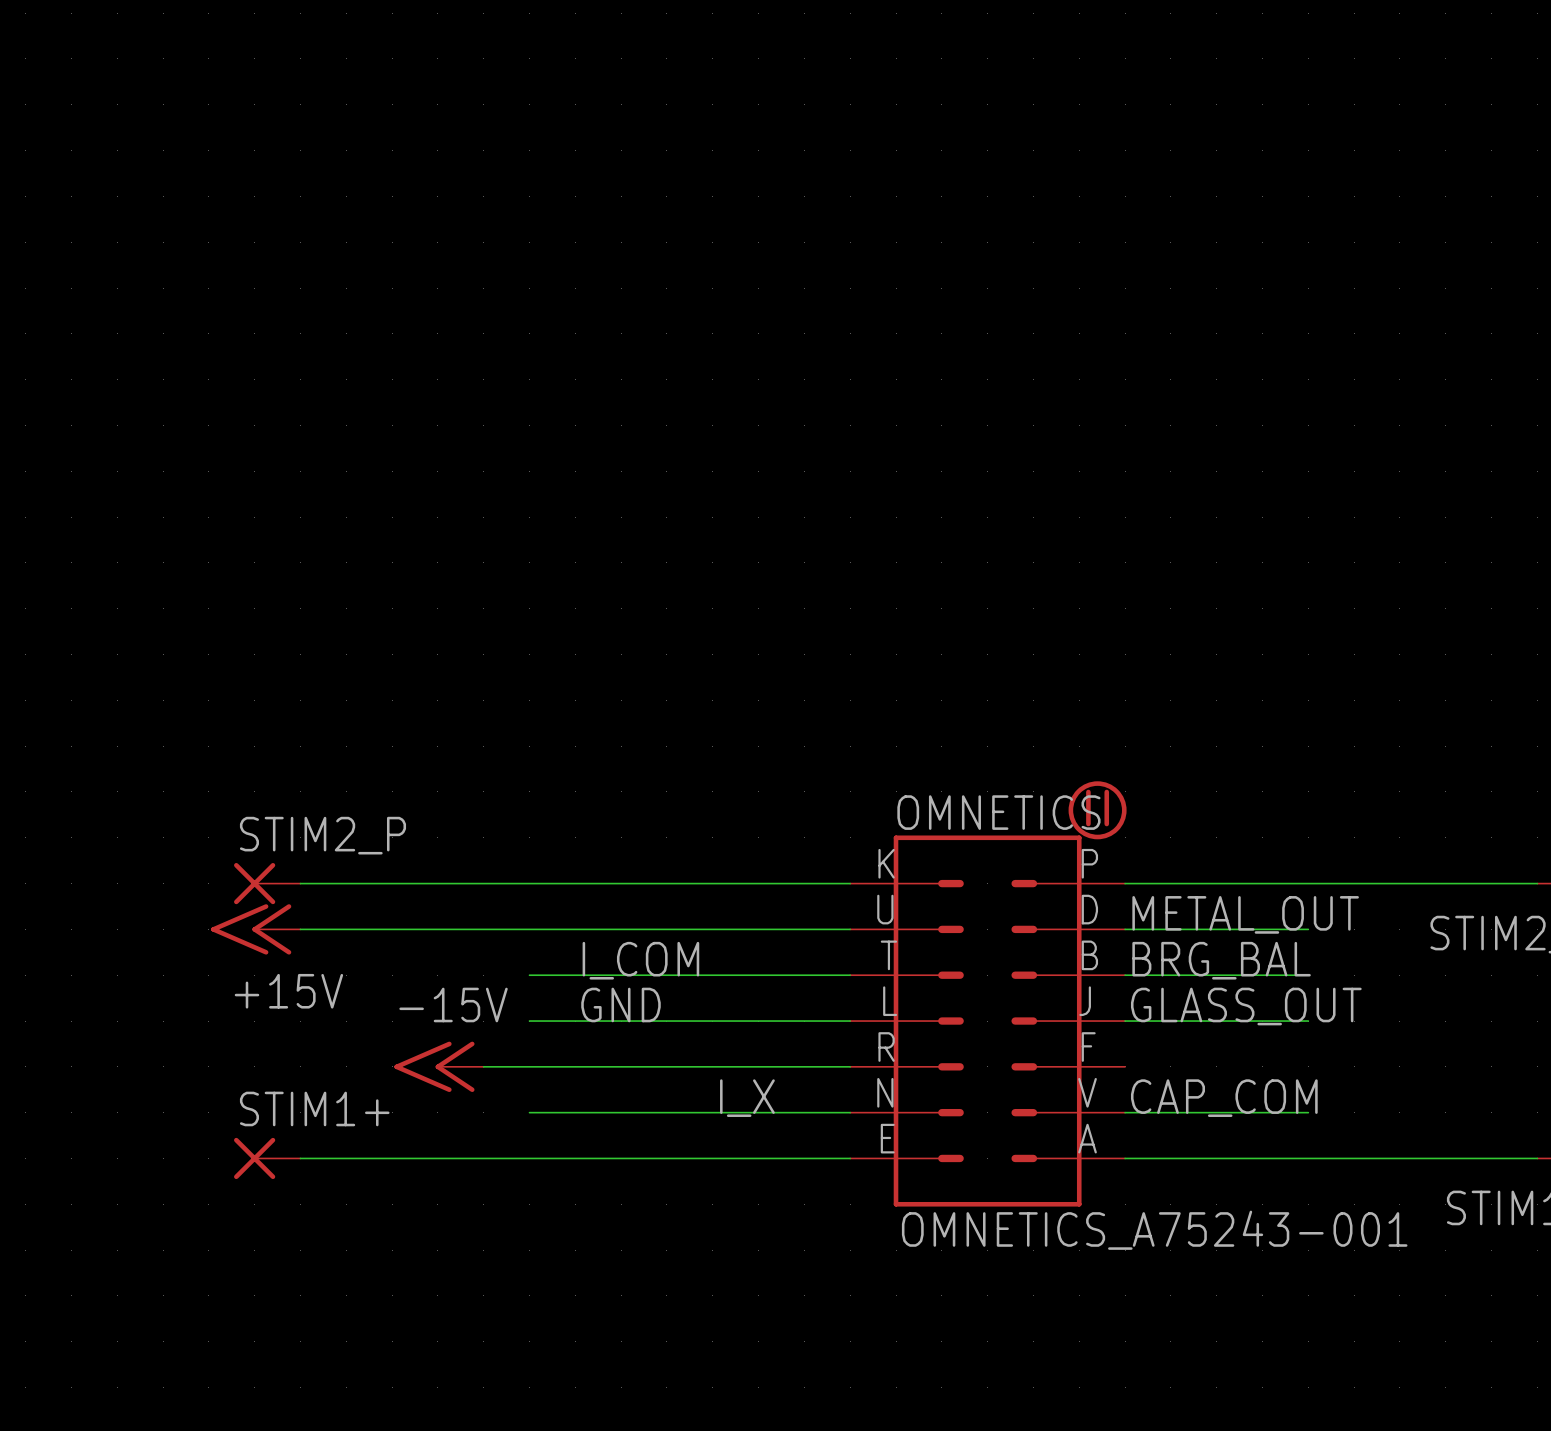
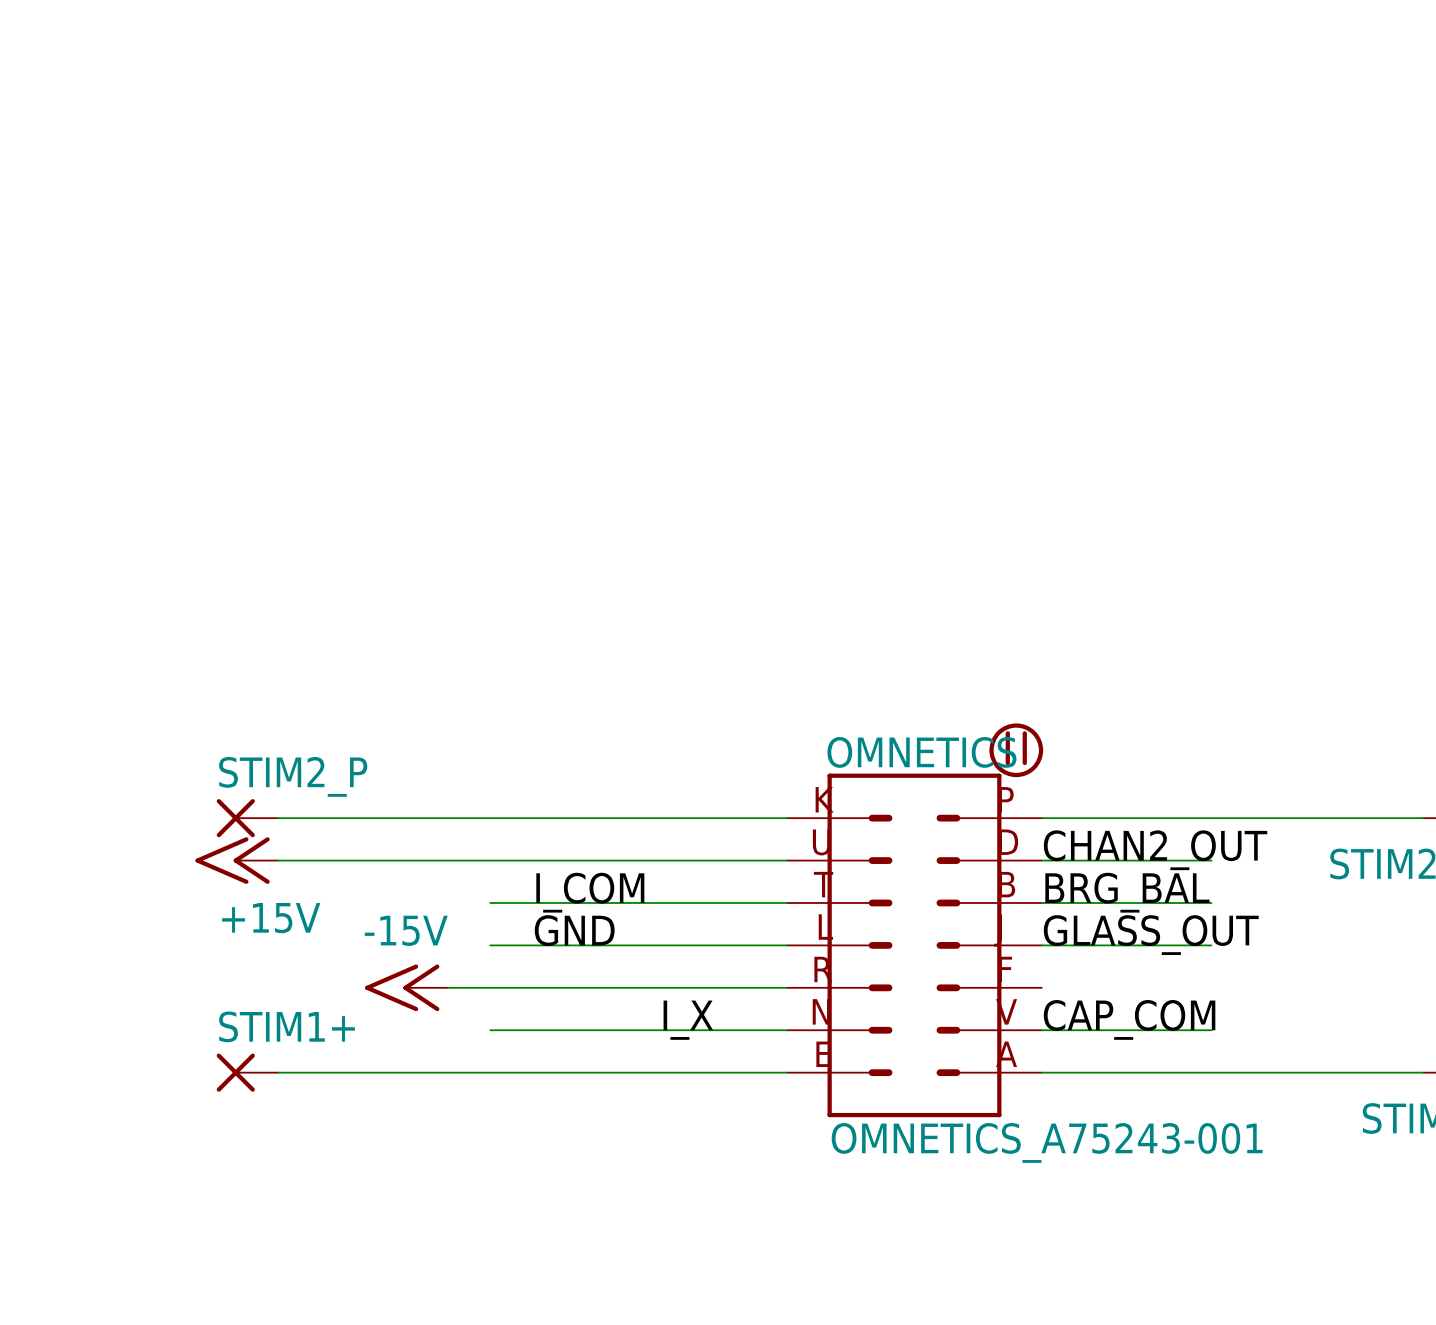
label: METAL_OUT (1245, 914) -> CHAN2_OUT (1155, 850)

